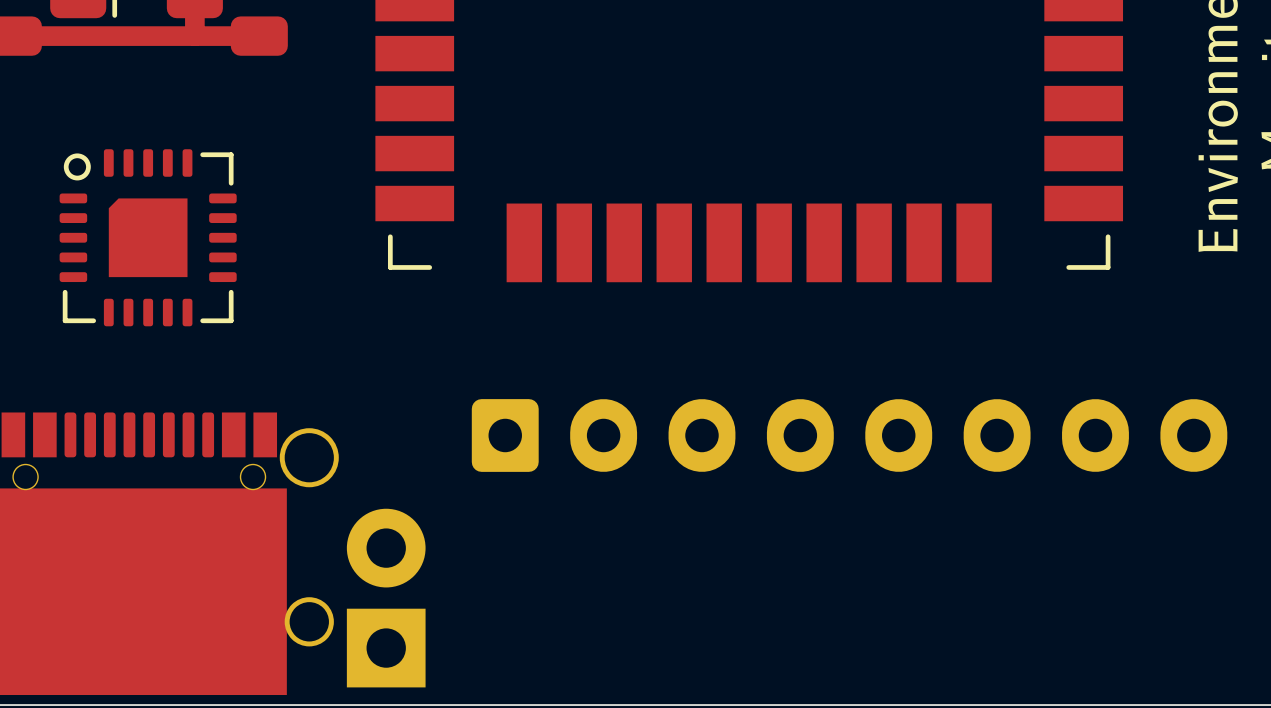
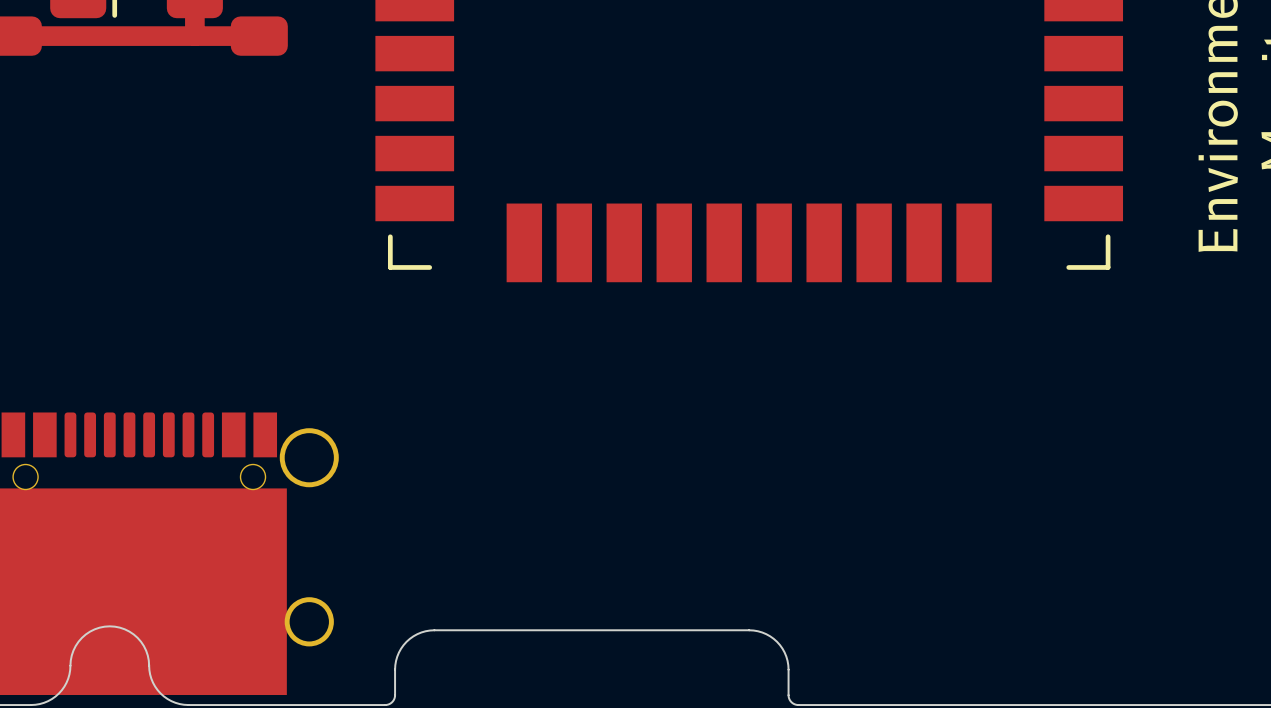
part: (148, 237) -> none
part: (849, 435) -> none
part: (386, 598) -> none
board edge: (31, 705) (188, 705) -> (31, 705) (44, 702) (58, 693) (68, 678) (71, 655) (78, 641) (94, 629) (109, 626) (124, 629) (141, 641) (147, 655) (151, 678) (160, 693) (171, 701) (188, 705)
board edge: (385, 705) (798, 705) -> (385, 705) (391, 702) (394, 697) (395, 665) (401, 648) (417, 634) (434, 630) (757, 631) (773, 638) (784, 652) (788, 665) (788, 697) (792, 702) (798, 705)

